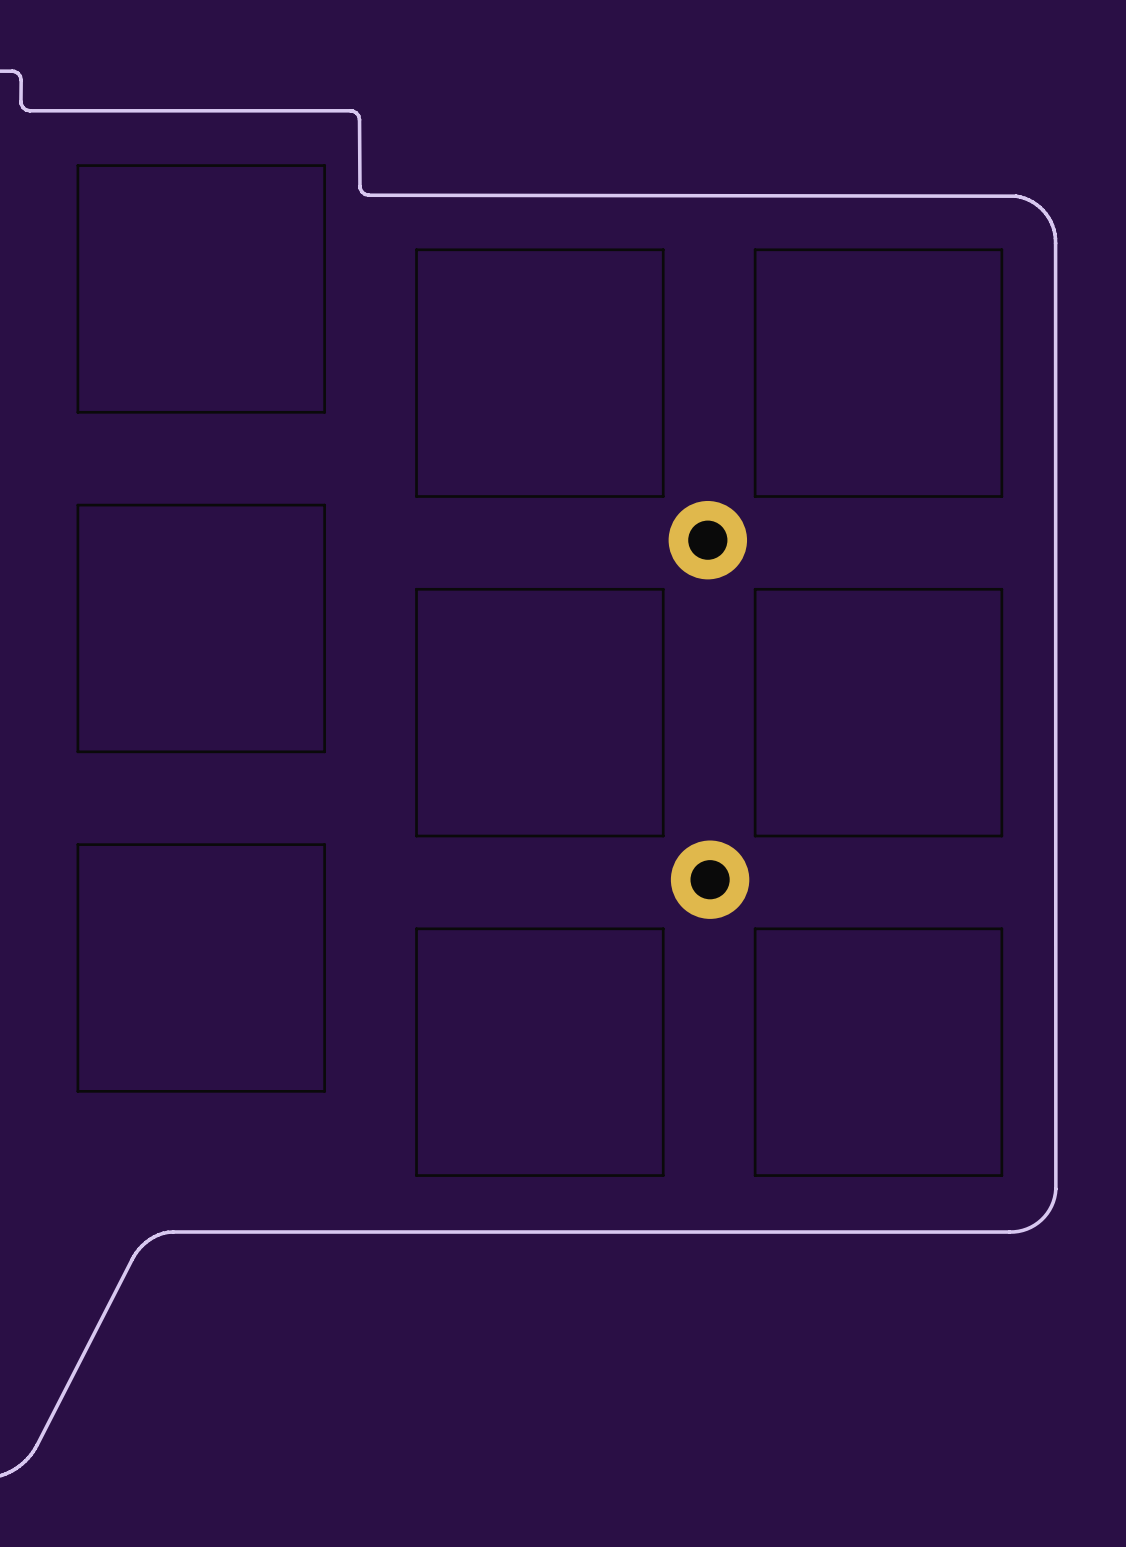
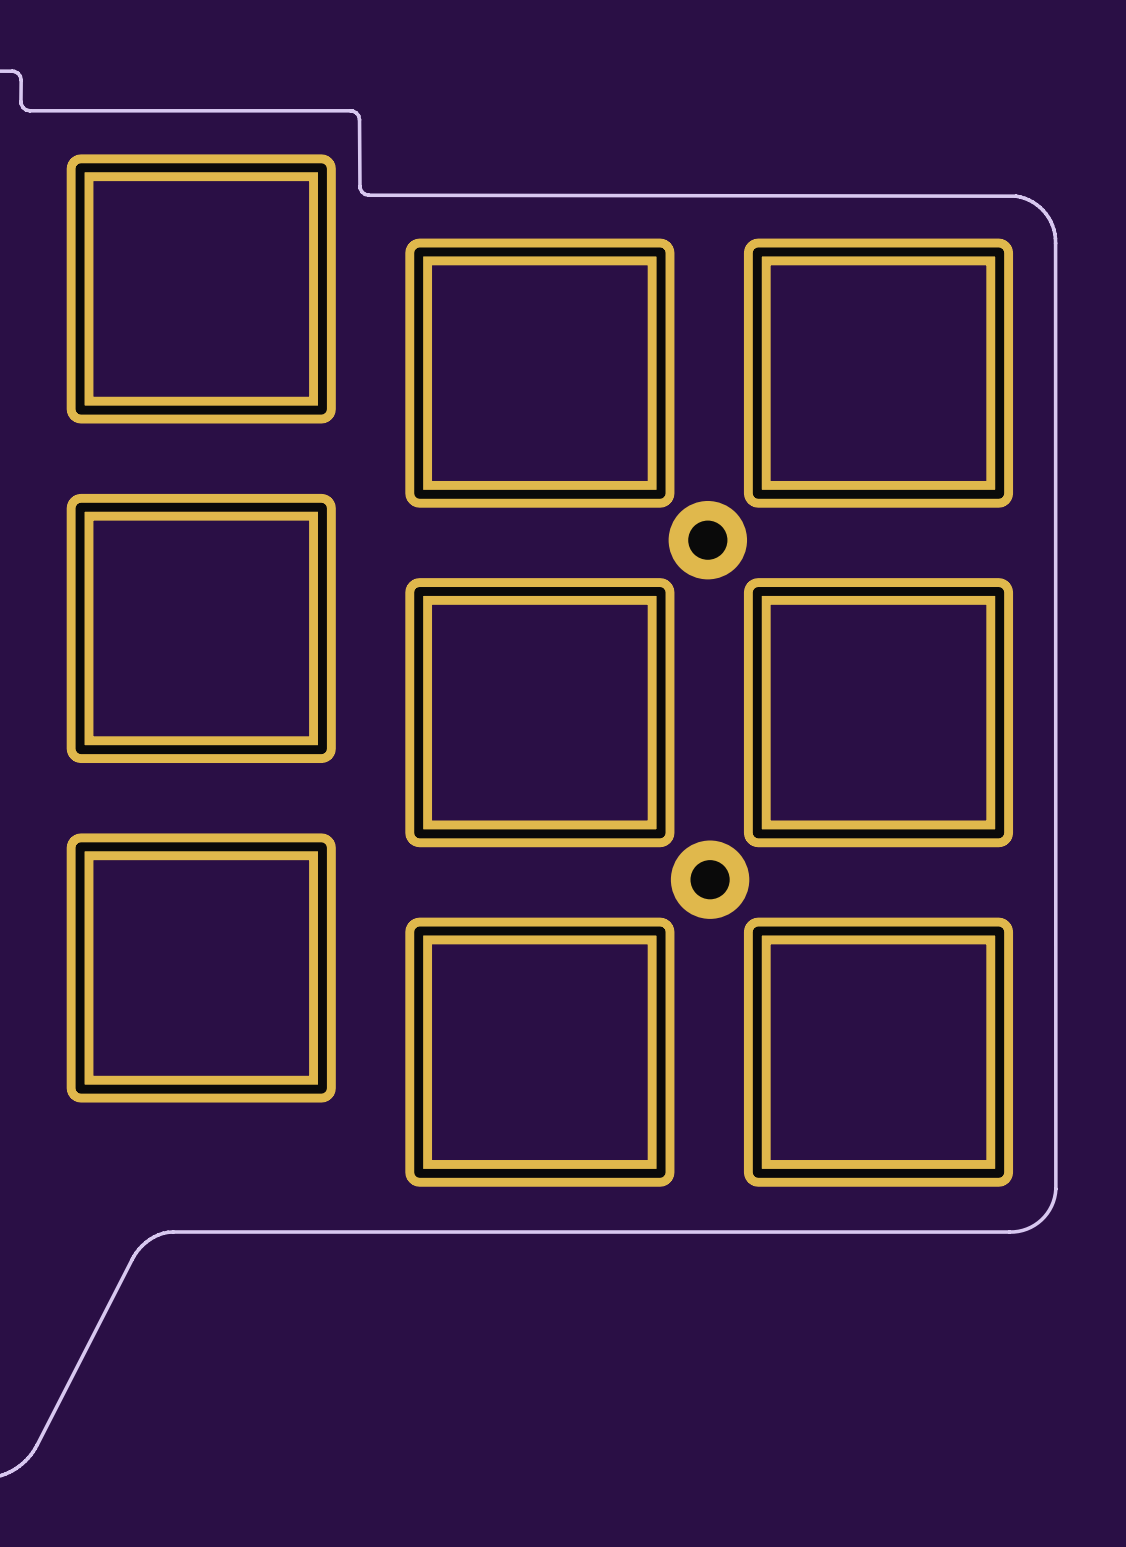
part footprint: [76, 164, 327, 414] -> [66, 154, 336, 424]
part footprint: [415, 248, 665, 498] -> [405, 238, 675, 508]
part footprint: [753, 248, 1004, 498] -> [743, 238, 1014, 508]
part footprint: [76, 503, 327, 754] -> [66, 493, 336, 764]
part footprint: [415, 587, 665, 838] -> [405, 578, 675, 848]
part footprint: [753, 587, 1004, 838] -> [743, 578, 1014, 848]
part footprint: [76, 843, 327, 1093] -> [66, 833, 336, 1103]
part footprint: [415, 927, 665, 1177] -> [405, 917, 675, 1187]
part footprint: [753, 927, 1004, 1177] -> [743, 917, 1014, 1187]

